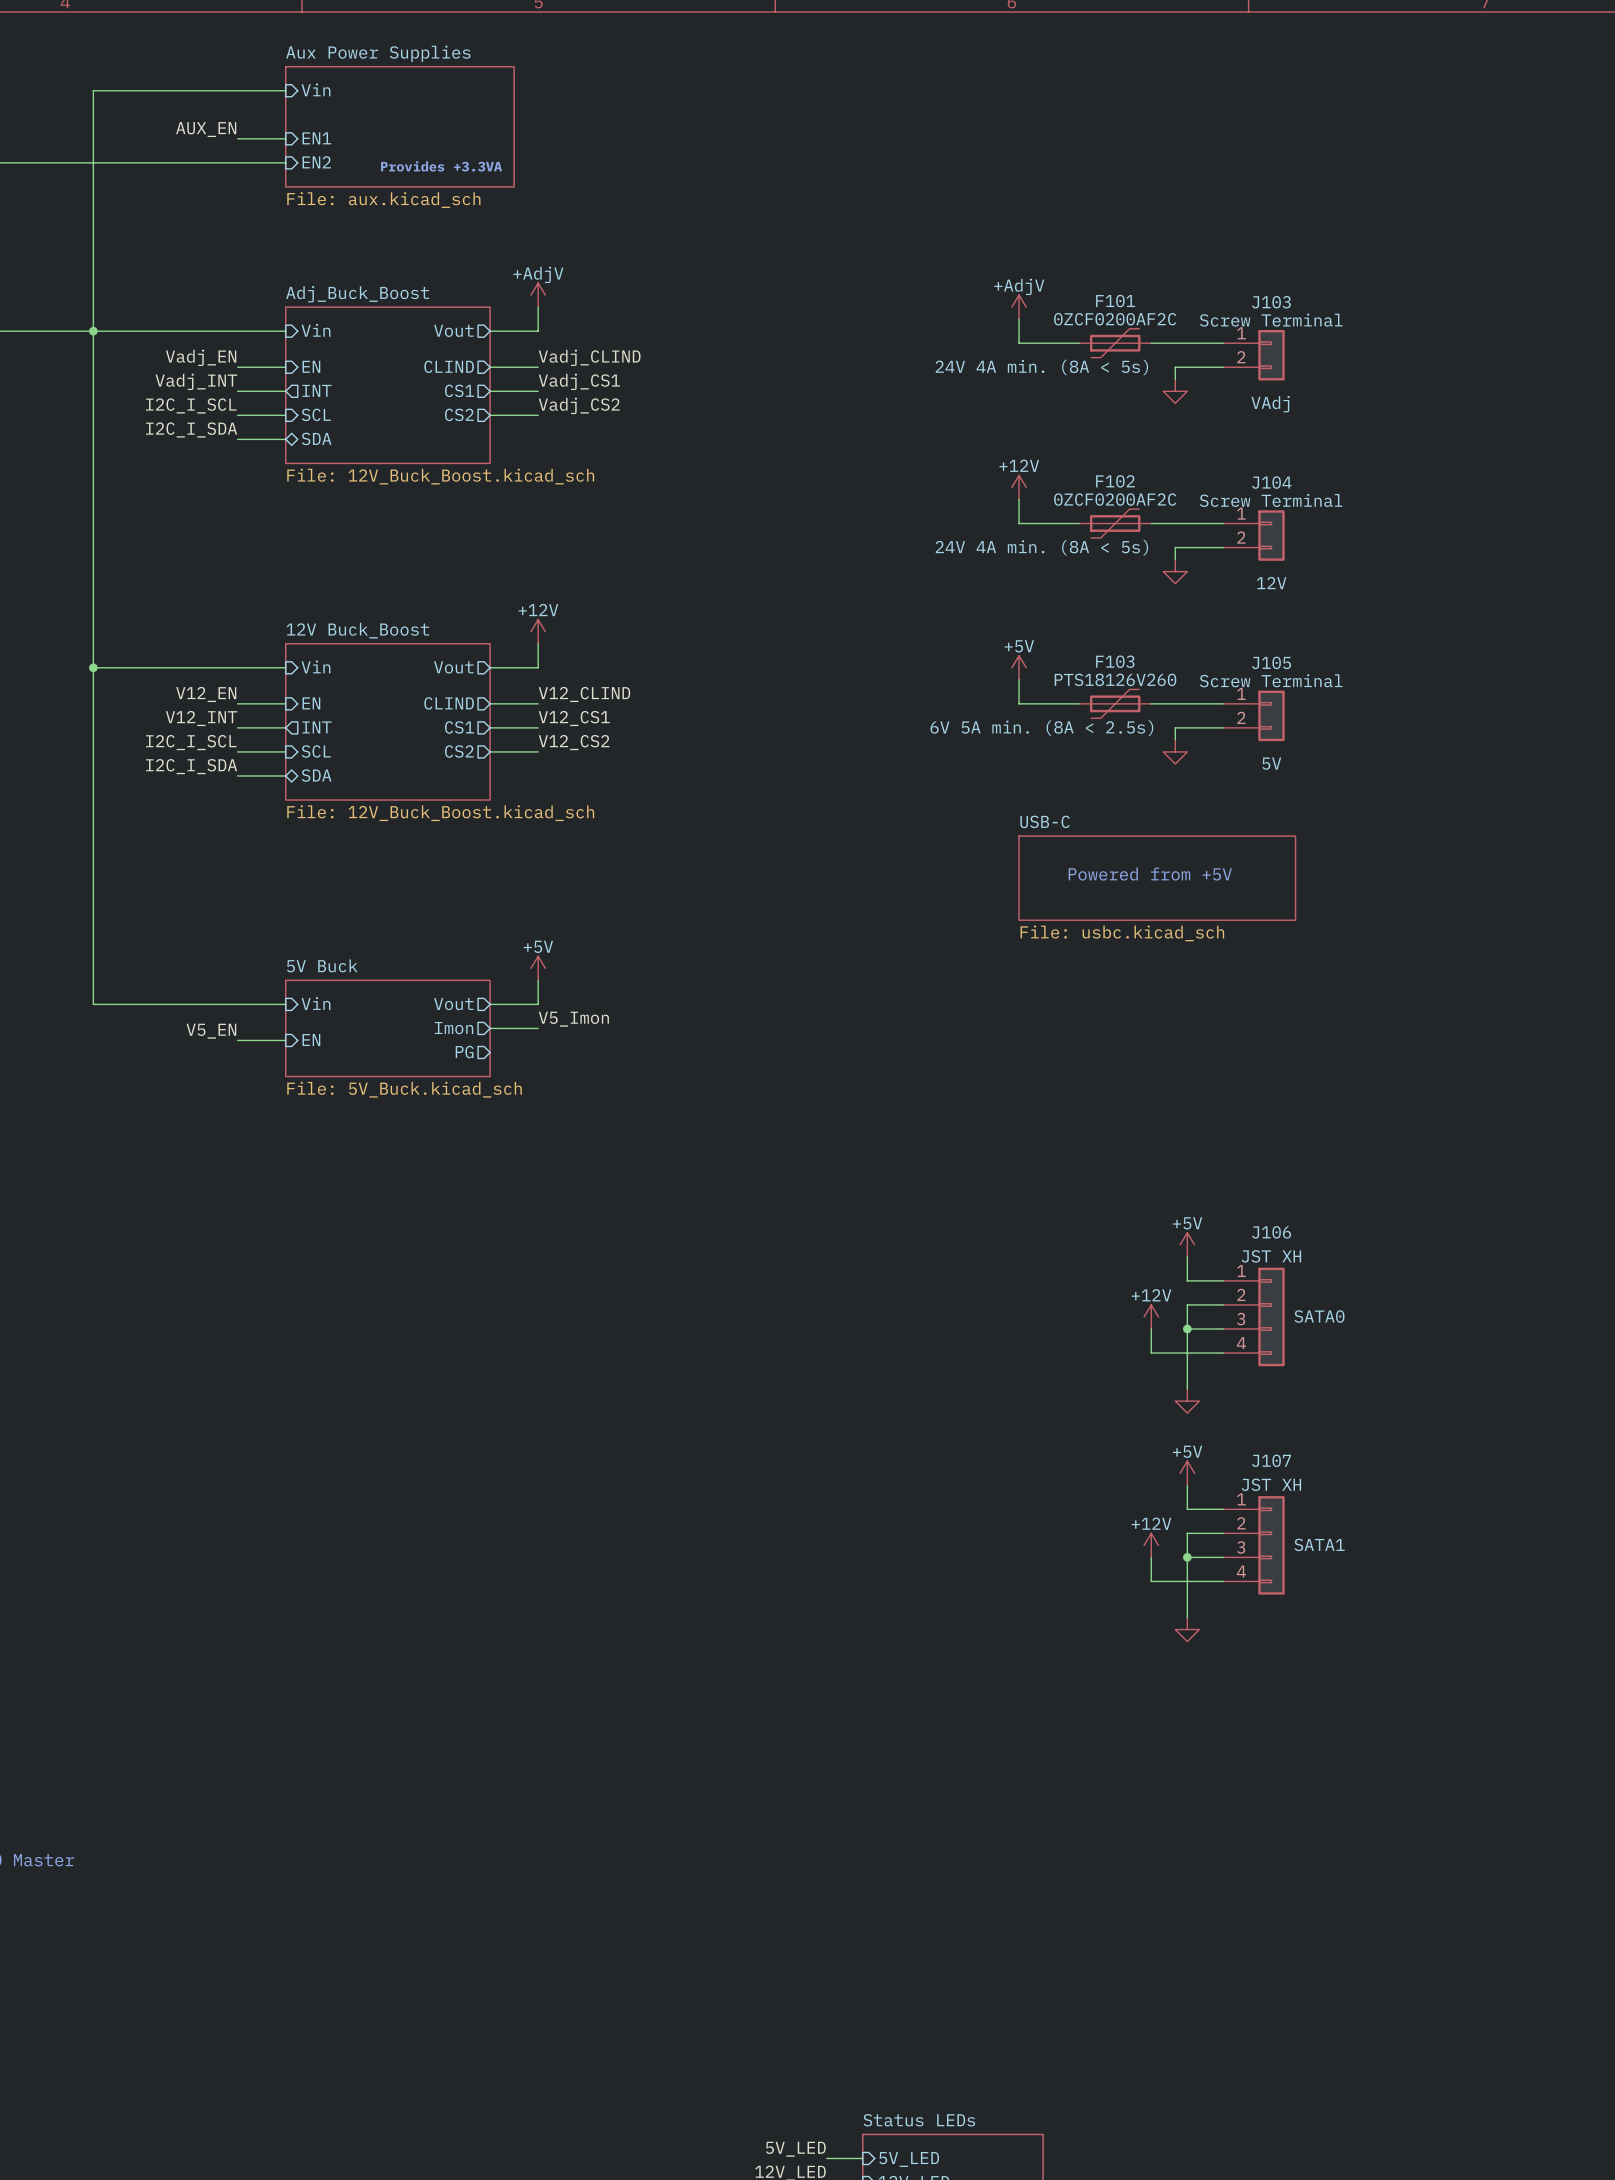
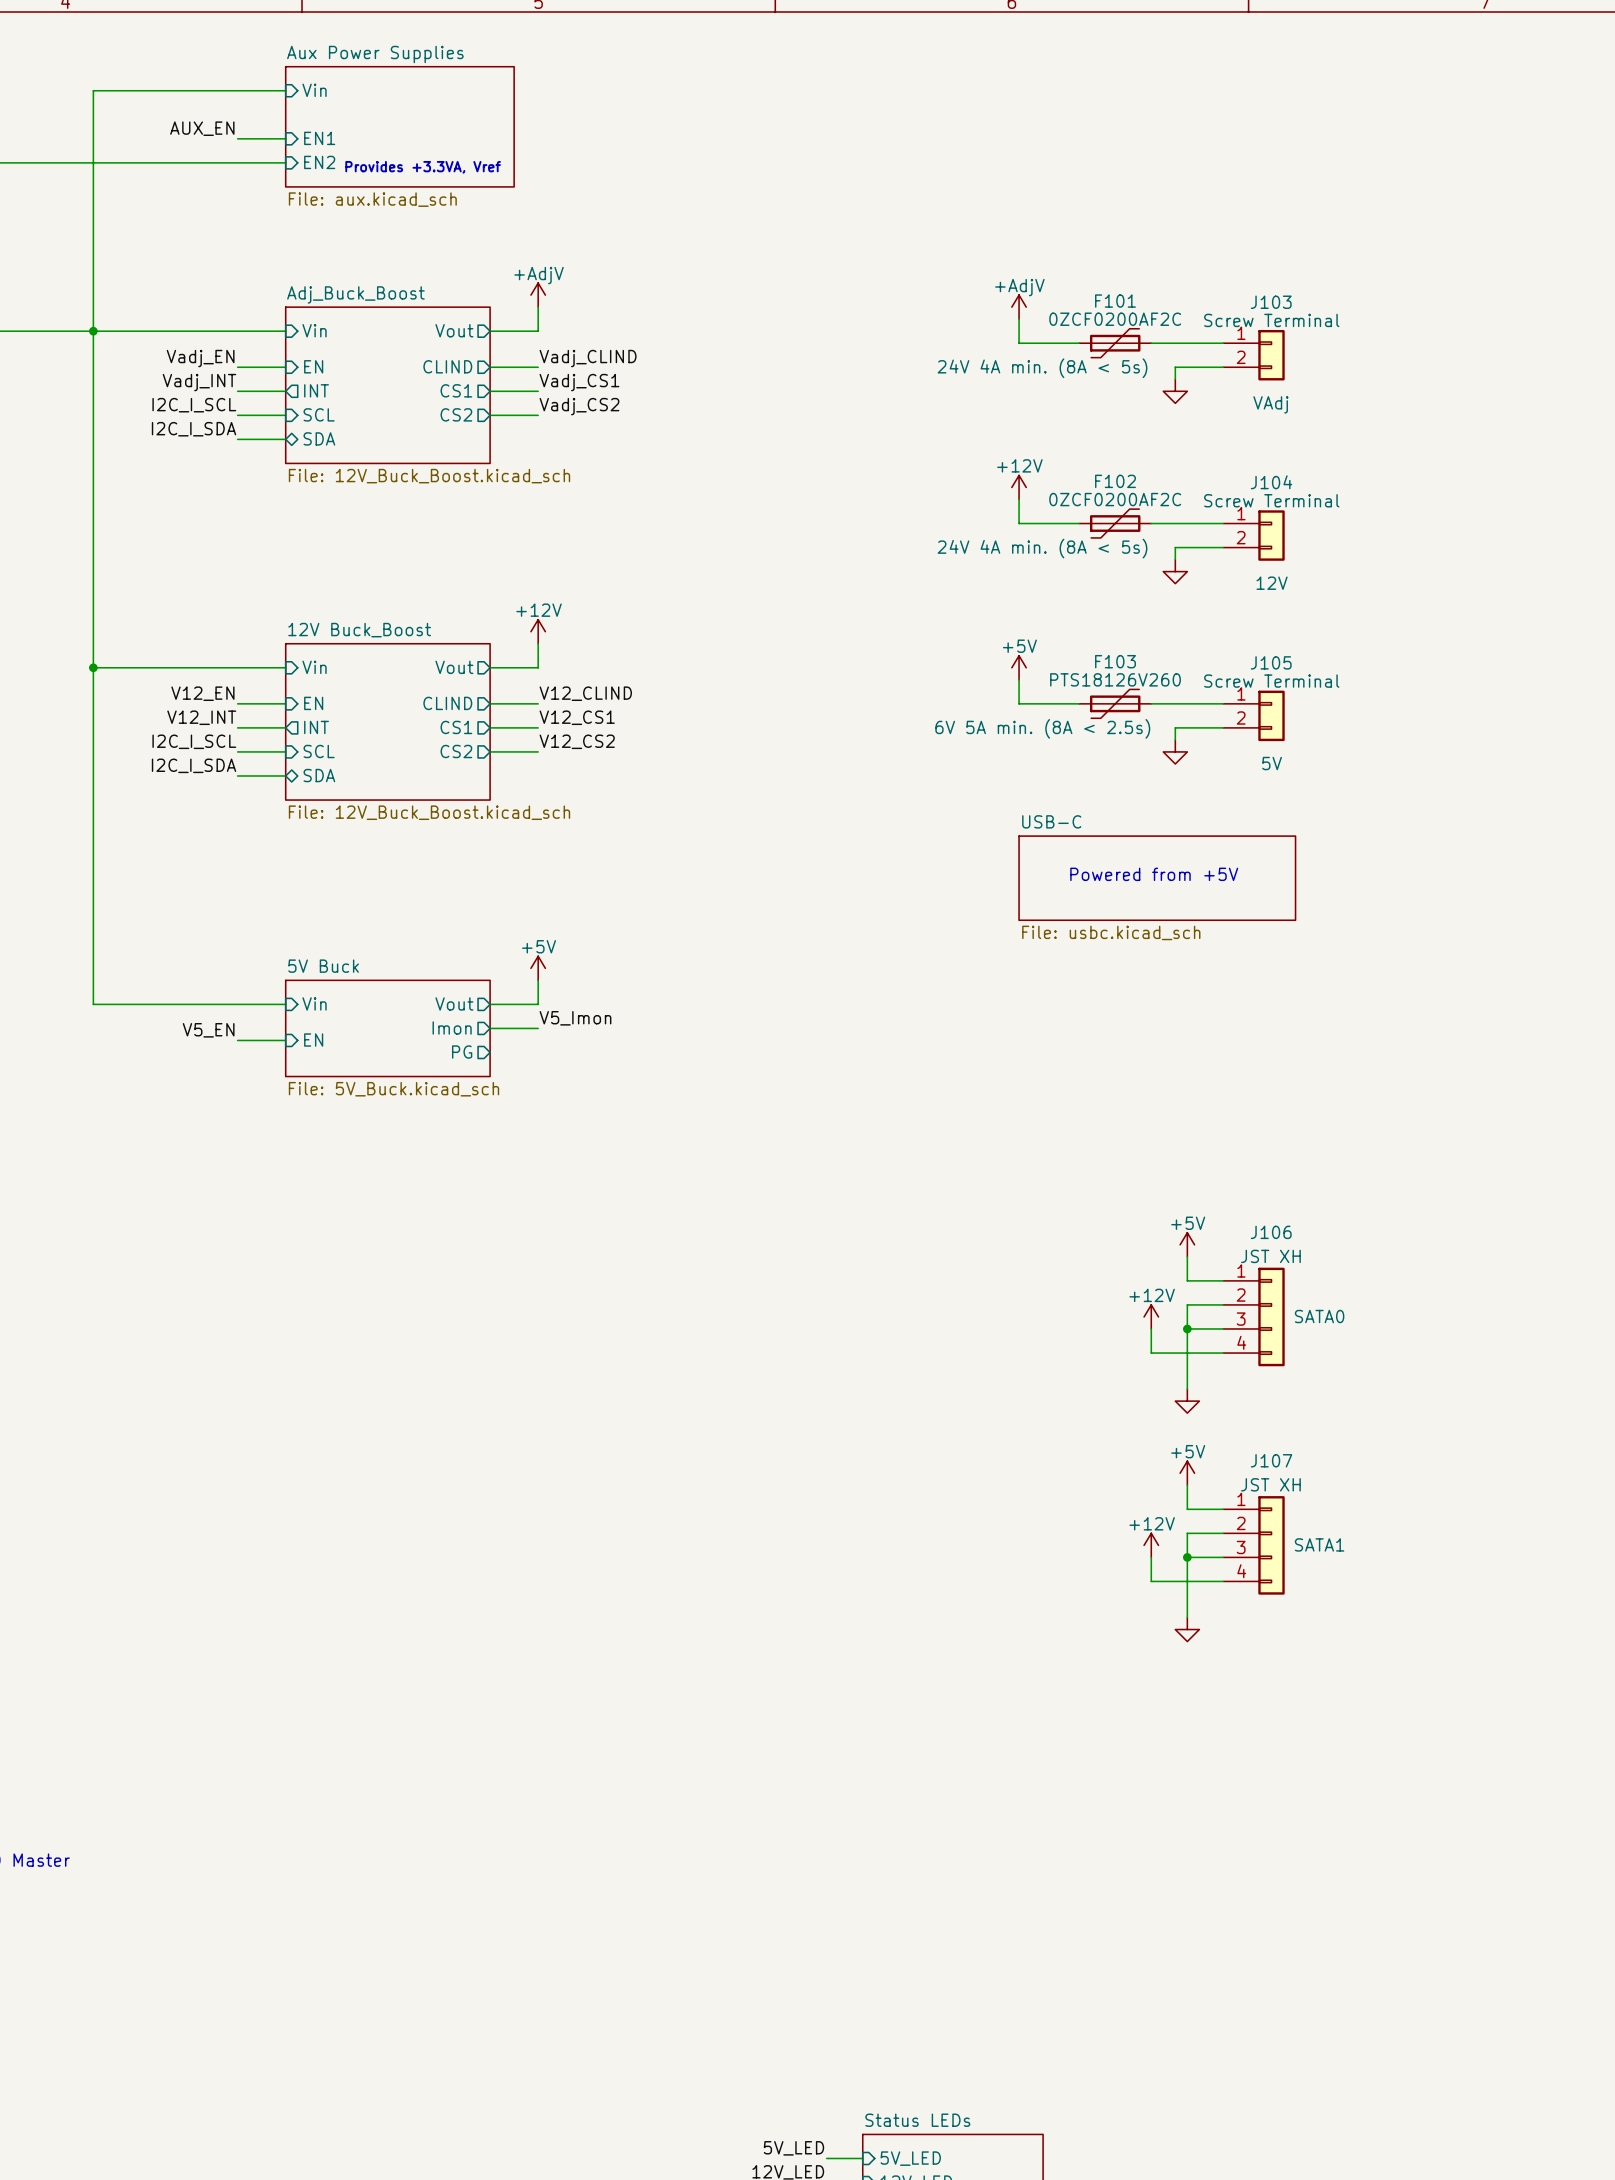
text: Provides +3.3VA (441, 166) -> Provides +3.3VA, Vref (423, 167)

